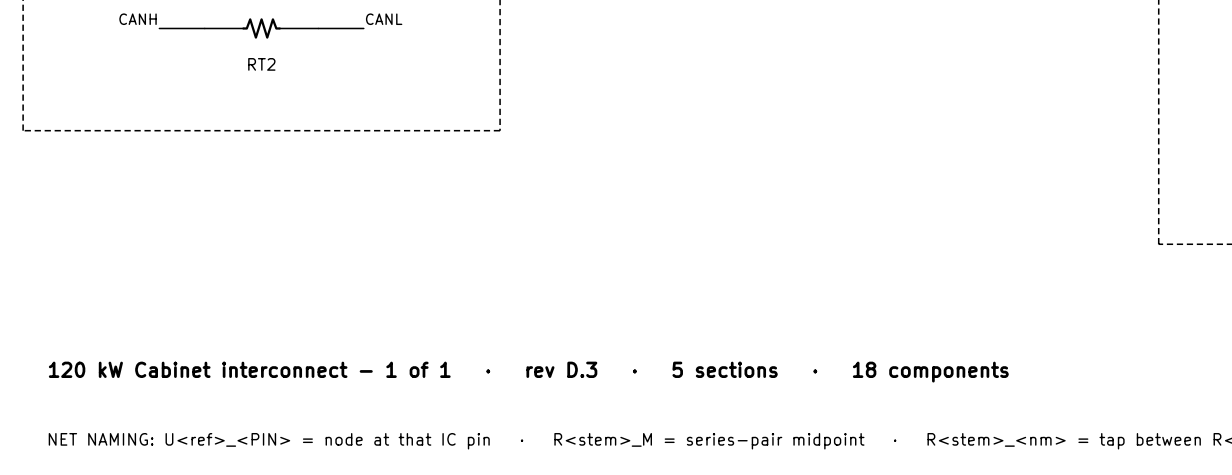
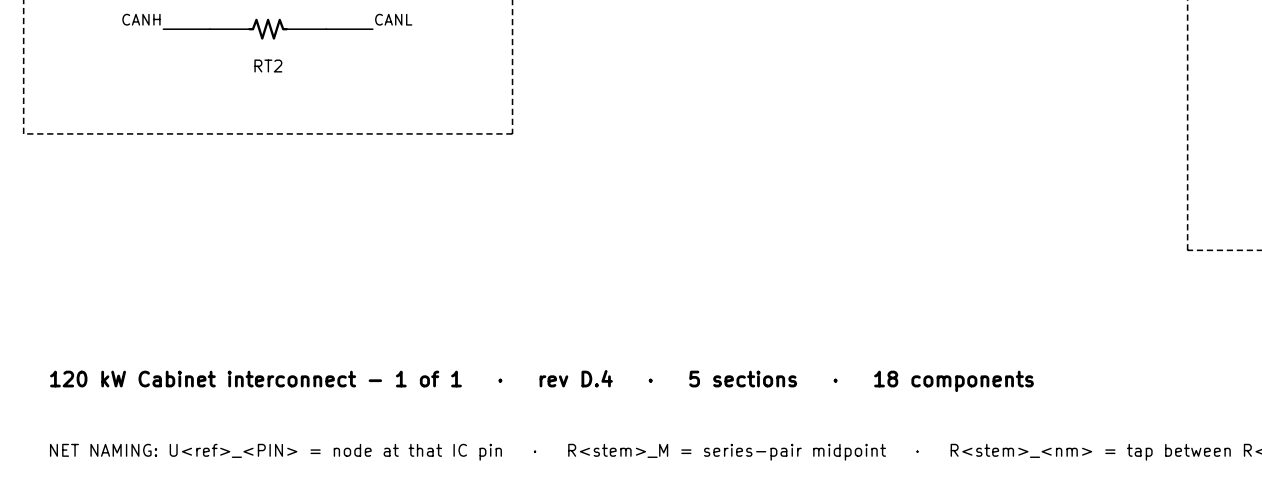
text: 120 kW Cabinet interconnect - 1 of 1 · rev D.3 · 5 sections · 18 components (528, 372) -> 120 kW Cabinet interconnect - 1 of 1 · rev D.4 · 5 sections · 18 components (541, 381)

